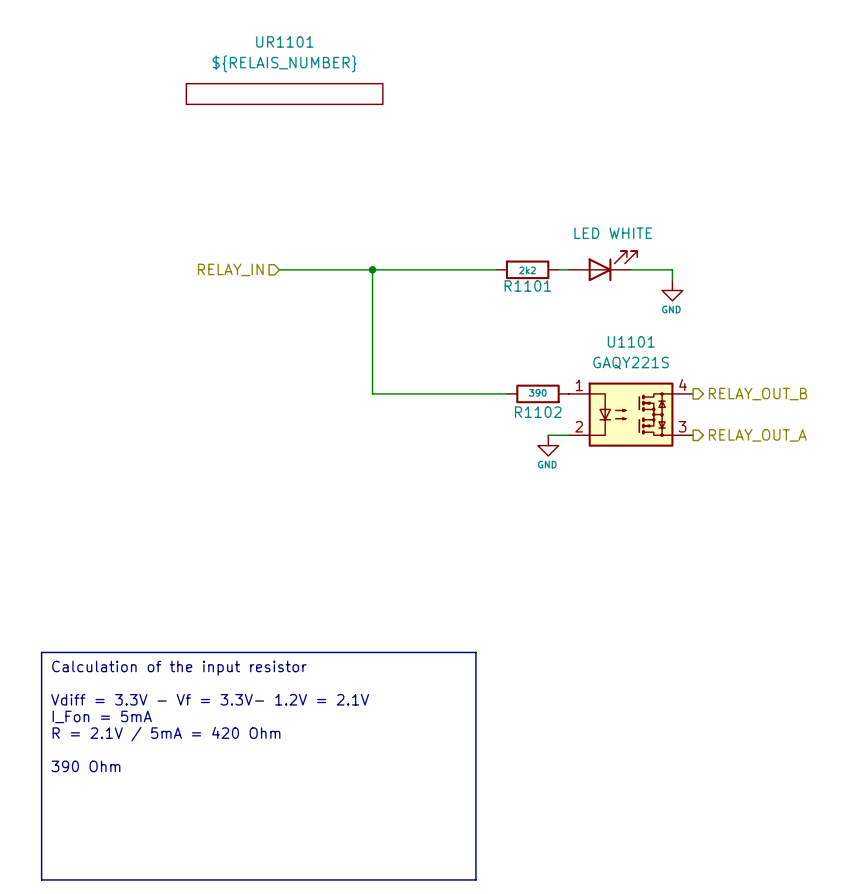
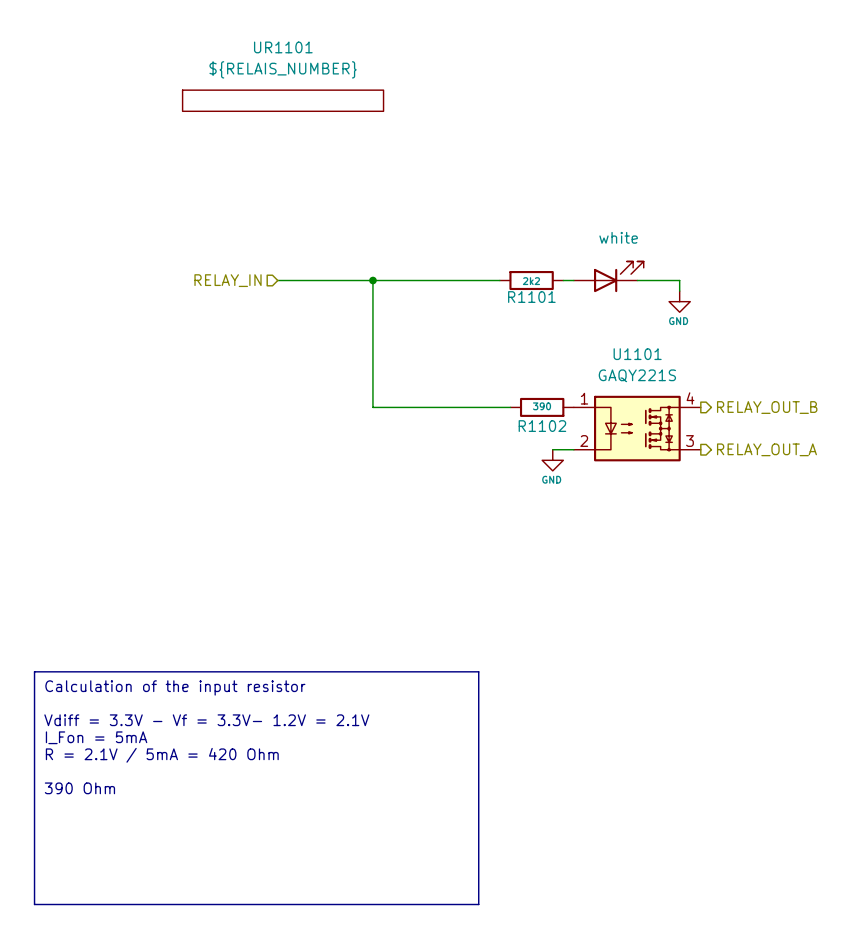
part value: LED WHITE (613, 233) -> white (618, 237)

